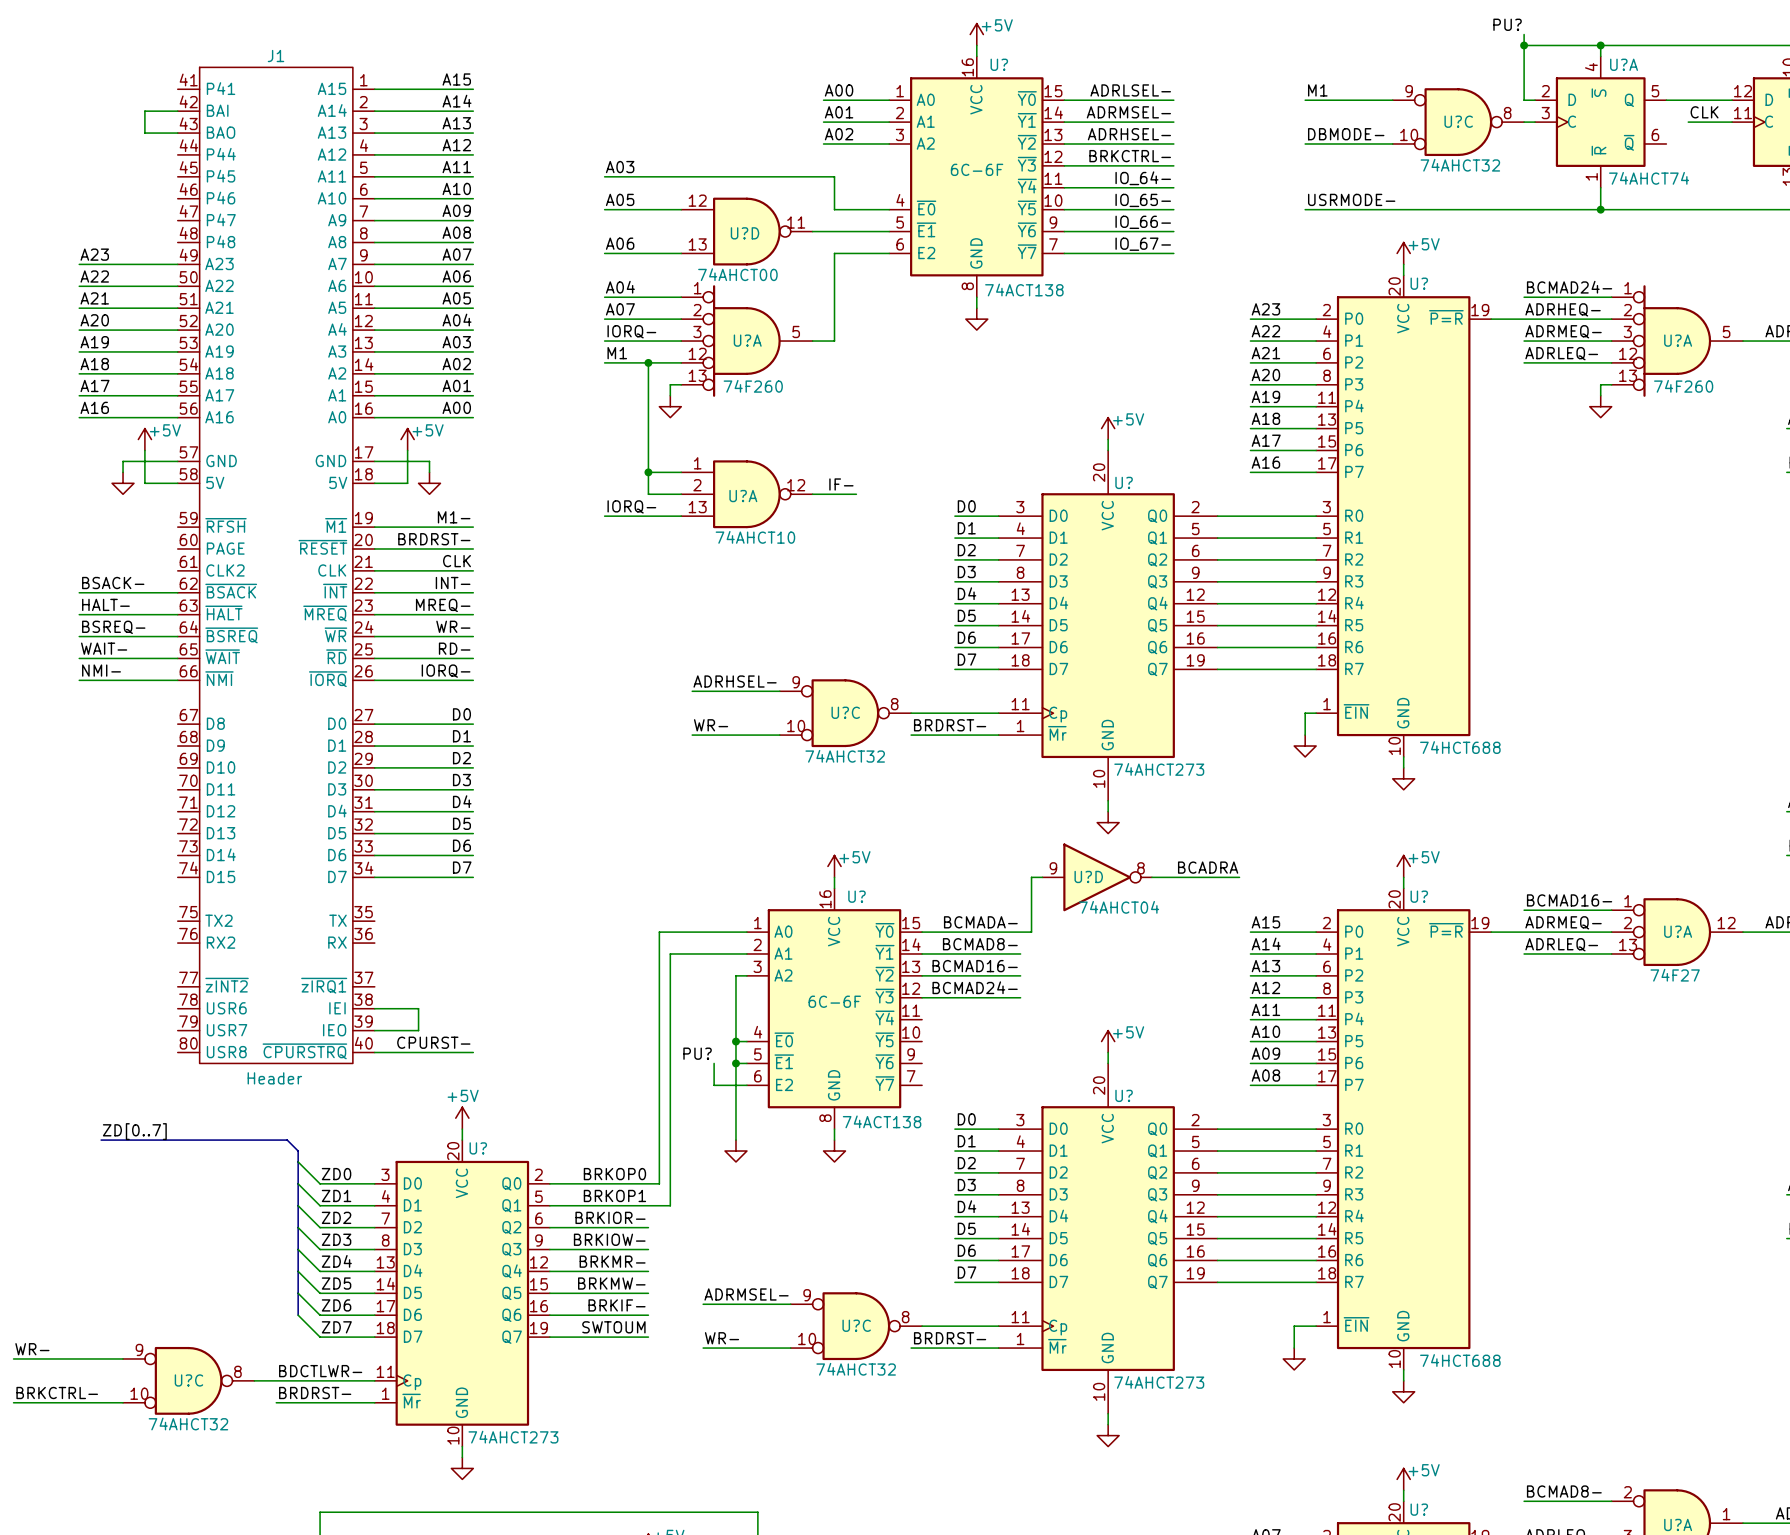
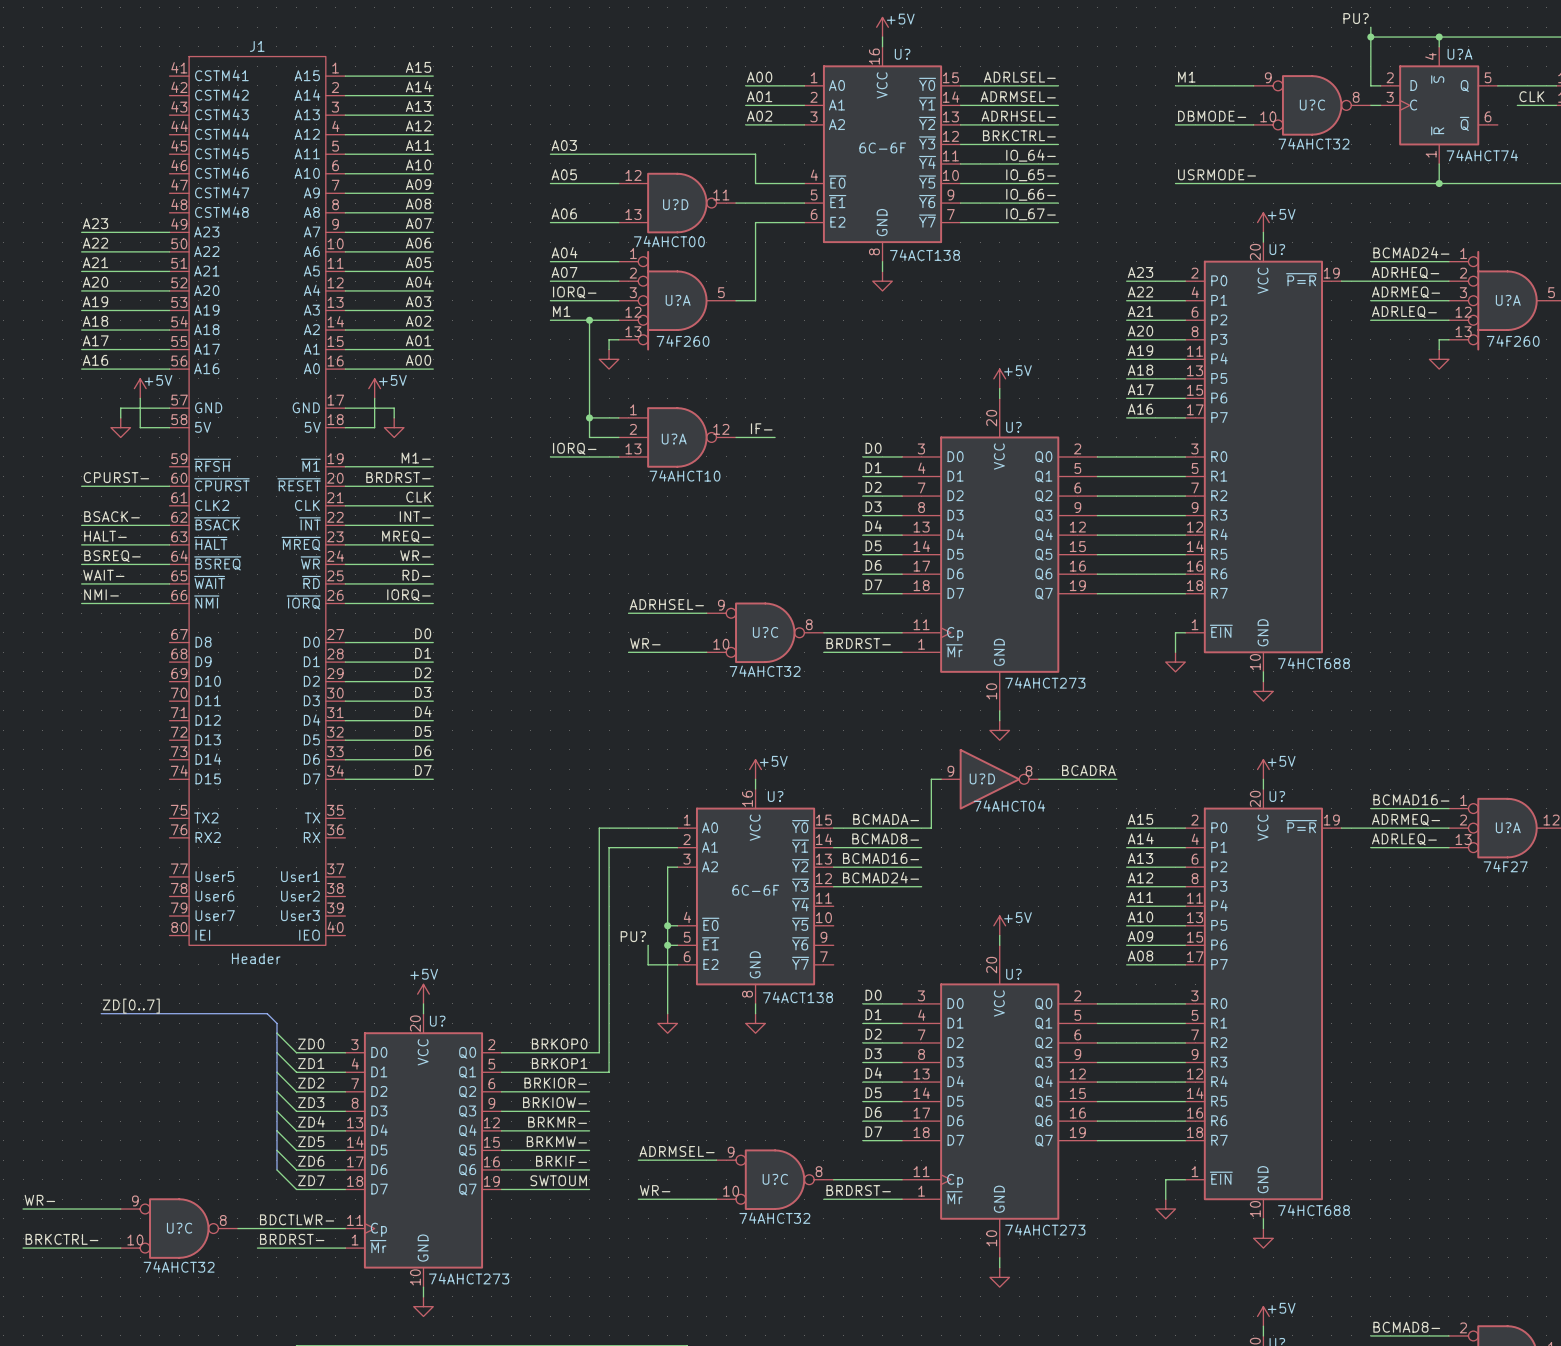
J1 symbol: [177, 67, 375, 1064] -> [169, 56, 346, 946]
wire: (177, 111) (144, 111) (144, 133) (177, 133) -> none
label: none -> CPURST- (116, 477)
wire: none -> (81, 486) (169, 486)
wire: (374, 1008) (418, 1008) (418, 1030) (374, 1030) -> none
label: CPURST- (433, 1042) -> none
wire: (374, 1052) (473, 1052) -> none

